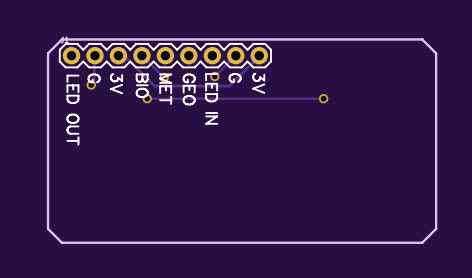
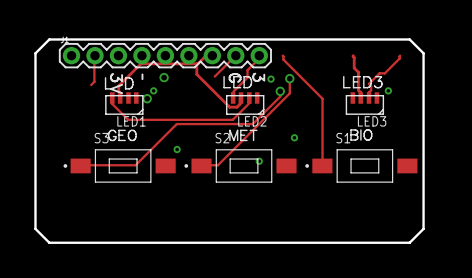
board edge: (61, 39) (48, 53) (48, 228) (61, 242) -> (61, 39) (49, 39) (35, 53) (35, 228) (49, 242) (61, 242)
board edge: (409, 39) (422, 39) (436, 53) (436, 228) (422, 242) (409, 242) -> (409, 39) (423, 53) (423, 228) (409, 242)
track: (118, 55) (125, 56) (154, 86) (229, 86) (259, 56) -> (233, 98) (233, 91) (247, 77) (247, 70) (259, 56)
track: (141, 55) (164, 77) -> none
track: none -> (212, 55) (205, 56) (197, 63) (140, 63) (118, 86) (120, 98)
track: none -> (282, 55) (283, 59) (322, 98) (322, 165)
track: none -> (353, 55) (354, 68) (358, 72) (358, 90) (360, 98)
track: none -> (400, 55) (399, 58) (384, 73) (379, 73) (368, 83) (371, 86) (369, 98)
track: none -> (196, 63) (196, 74) (229, 107) (236, 107) (240, 104) (241, 98)
line: (136, 74) (147, 74) (147, 80) (144, 81) (142, 79) (140, 81) (137, 81) (136, 74) -> none
line: (160, 74) (171, 74) (160, 78) (171, 82) (160, 82) -> none
line: (217, 74) (206, 74) (206, 80) -> none
line: (78, 75) (67, 75) (67, 81) -> none
via: (214, 76) -> none
line: none -> (224, 76) (224, 87) (230, 87)
line: none -> (240, 76) (233, 76) (233, 87) (240, 87)
line: none -> (244, 76) (244, 87) (249, 87) (251, 83) (250, 78) (244, 76)
line: none -> (343, 76) (343, 87) (350, 87)
line: none -> (360, 76) (353, 76) (353, 87) (360, 87)
line: none -> (363, 76) (370, 78) (371, 83) (369, 87) (363, 87) (363, 76)
line: none -> (375, 76) (381, 76) (378, 80) (381, 84) (378, 87) (374, 85)
line: none -> (105, 77) (105, 88) (111, 88)
line: none -> (125, 77) (125, 88) (130, 88) (132, 84) (131, 79) (125, 77)
track: none -> (289, 78) (289, 93) (217, 165) (201, 165)
via: none -> (289, 78)
line: (92, 79) (92, 82) (89, 80) (90, 75) (98, 75) (99, 79) (96, 82) -> none
line: (187, 79) (187, 82) (184, 80) (185, 75) (193, 75) (194, 79) (192, 82) -> none
via: none -> (271, 79)
line: none -> (353, 81) (357, 81)
line: (211, 83) (211, 87) -> none
via: (91, 84) -> none
line: (264, 84) (253, 88) (264, 92) -> none
line: (73, 85) (73, 89) -> none
line: (136, 85) (147, 85) -> none
line: (189, 85) (189, 89) -> none
line: (165, 86) (165, 90) -> none
line: (140, 88) (147, 90) (146, 96) (140, 97) (137, 95) (137, 90) (140, 88) -> none
via: none -> (153, 90)
line: (206, 90) (206, 83) (217, 83) (217, 90) -> none
via: none -> (388, 90)
track: none -> (280, 91) (280, 96) (252, 124) (176, 124) (135, 165) (80, 165)
via: none -> (280, 91)
line: (67, 92) (67, 85) (78, 85) (78, 92) -> none
line: (183, 92) (183, 85) (194, 85) (194, 92) -> none
line: (160, 93) (160, 86) (171, 86) (171, 93) -> none
line: (206, 94) (207, 100) (212, 101) (216, 99) (217, 94) (206, 94) -> none
line: (67, 95) (69, 101) (74, 103) (77, 100) (78, 95) (67, 95) -> none
line: (171, 96) (171, 103) -> none
line: (187, 96) (194, 98) (193, 103) (187, 104) (184, 102) (184, 98) (187, 96) -> none
track: none -> (112, 98) (112, 104) (128, 119) (232, 119) (249, 102) (249, 98)
track: (147, 98) (323, 98) -> none
via: (323, 98) -> none
line: (160, 100) (171, 100) -> none
LED1: none -> (124, 103)
LED2: none -> (245, 103)
LED3: none -> (364, 103)
line: (206, 112) (217, 112) -> none
line: (71, 114) (77, 116) (76, 121) (71, 122) (67, 120) (67, 116) (71, 114) -> none
line: (206, 116) (217, 116) (206, 123) (217, 123) -> none
line: (78, 126) (70, 126) (67, 129) (69, 133) (78, 133) -> none
line: none -> (360, 129) (360, 140)
line: none -> (366, 129) (371, 133) (368, 140) (364, 136) (366, 129)
line: none -> (125, 130) (119, 130) (119, 140) (125, 140)
line: none -> (131, 130) (136, 134) (133, 140) (128, 136) (131, 130)
line: none -> (247, 130) (240, 130) (240, 140) (247, 140)
line: none -> (250, 130) (256, 130)
line: none -> (253, 130) (253, 140)
line: none -> (115, 132) (113, 130) (109, 131) (109, 139) (114, 139) (115, 136) (113, 136)
line: none -> (351, 134) (355, 134)
line: none -> (355, 134) (357, 130) (351, 129) (351, 140) (357, 139) (355, 134)
line: none -> (119, 135) (122, 135)
line: none -> (240, 135) (244, 135)
line: (78, 137) (78, 144) -> none
via: none -> (294, 137)
line: (67, 140) (78, 140) -> none
line: none -> (229, 140) (229, 130) (233, 140) (237, 130) (237, 140)
via: none -> (177, 149)
via: none -> (259, 161)
S3: none -> (119, 165)
S2: none -> (240, 165)
S1: none -> (361, 165)

